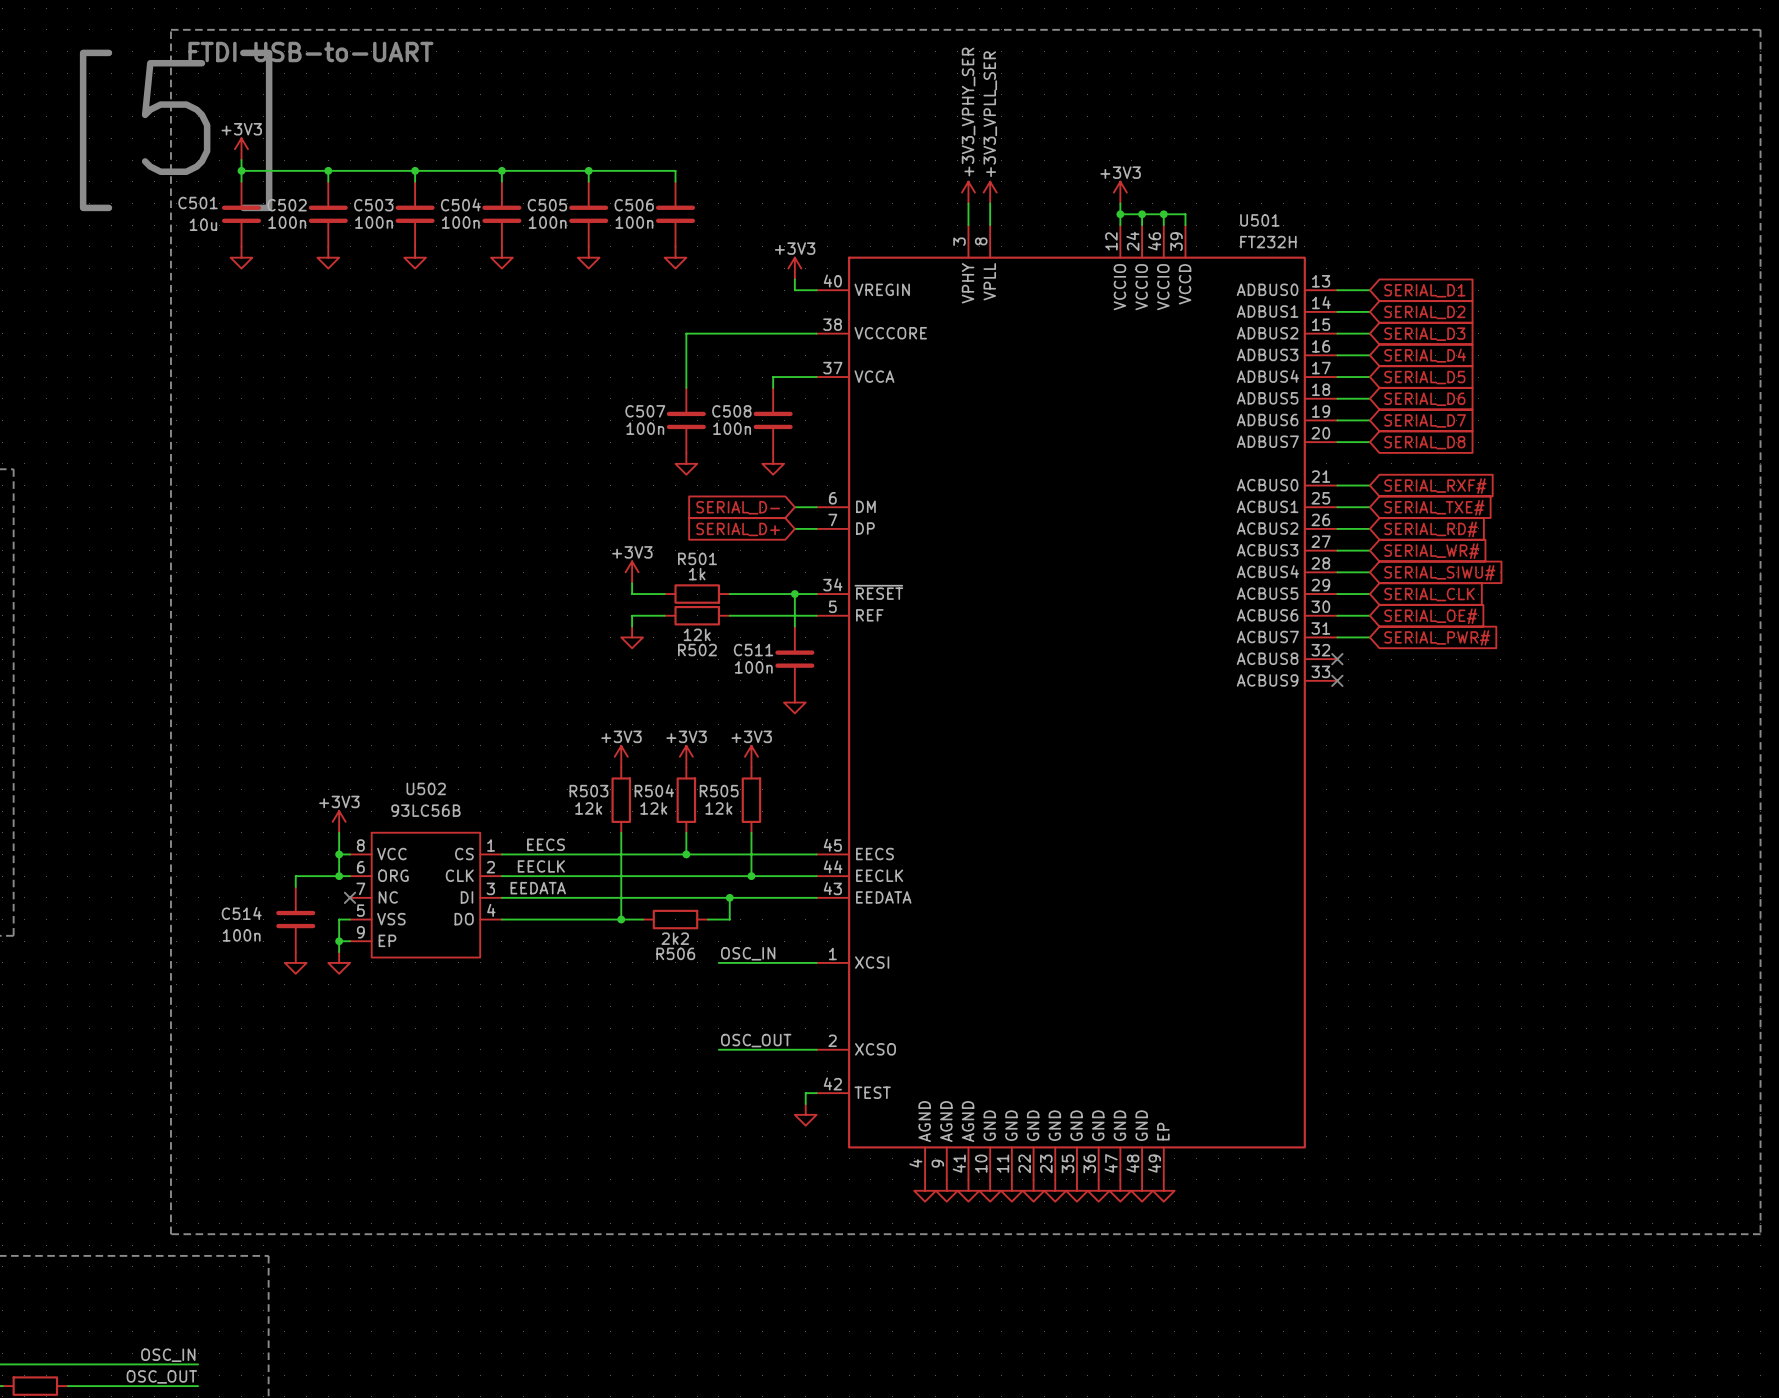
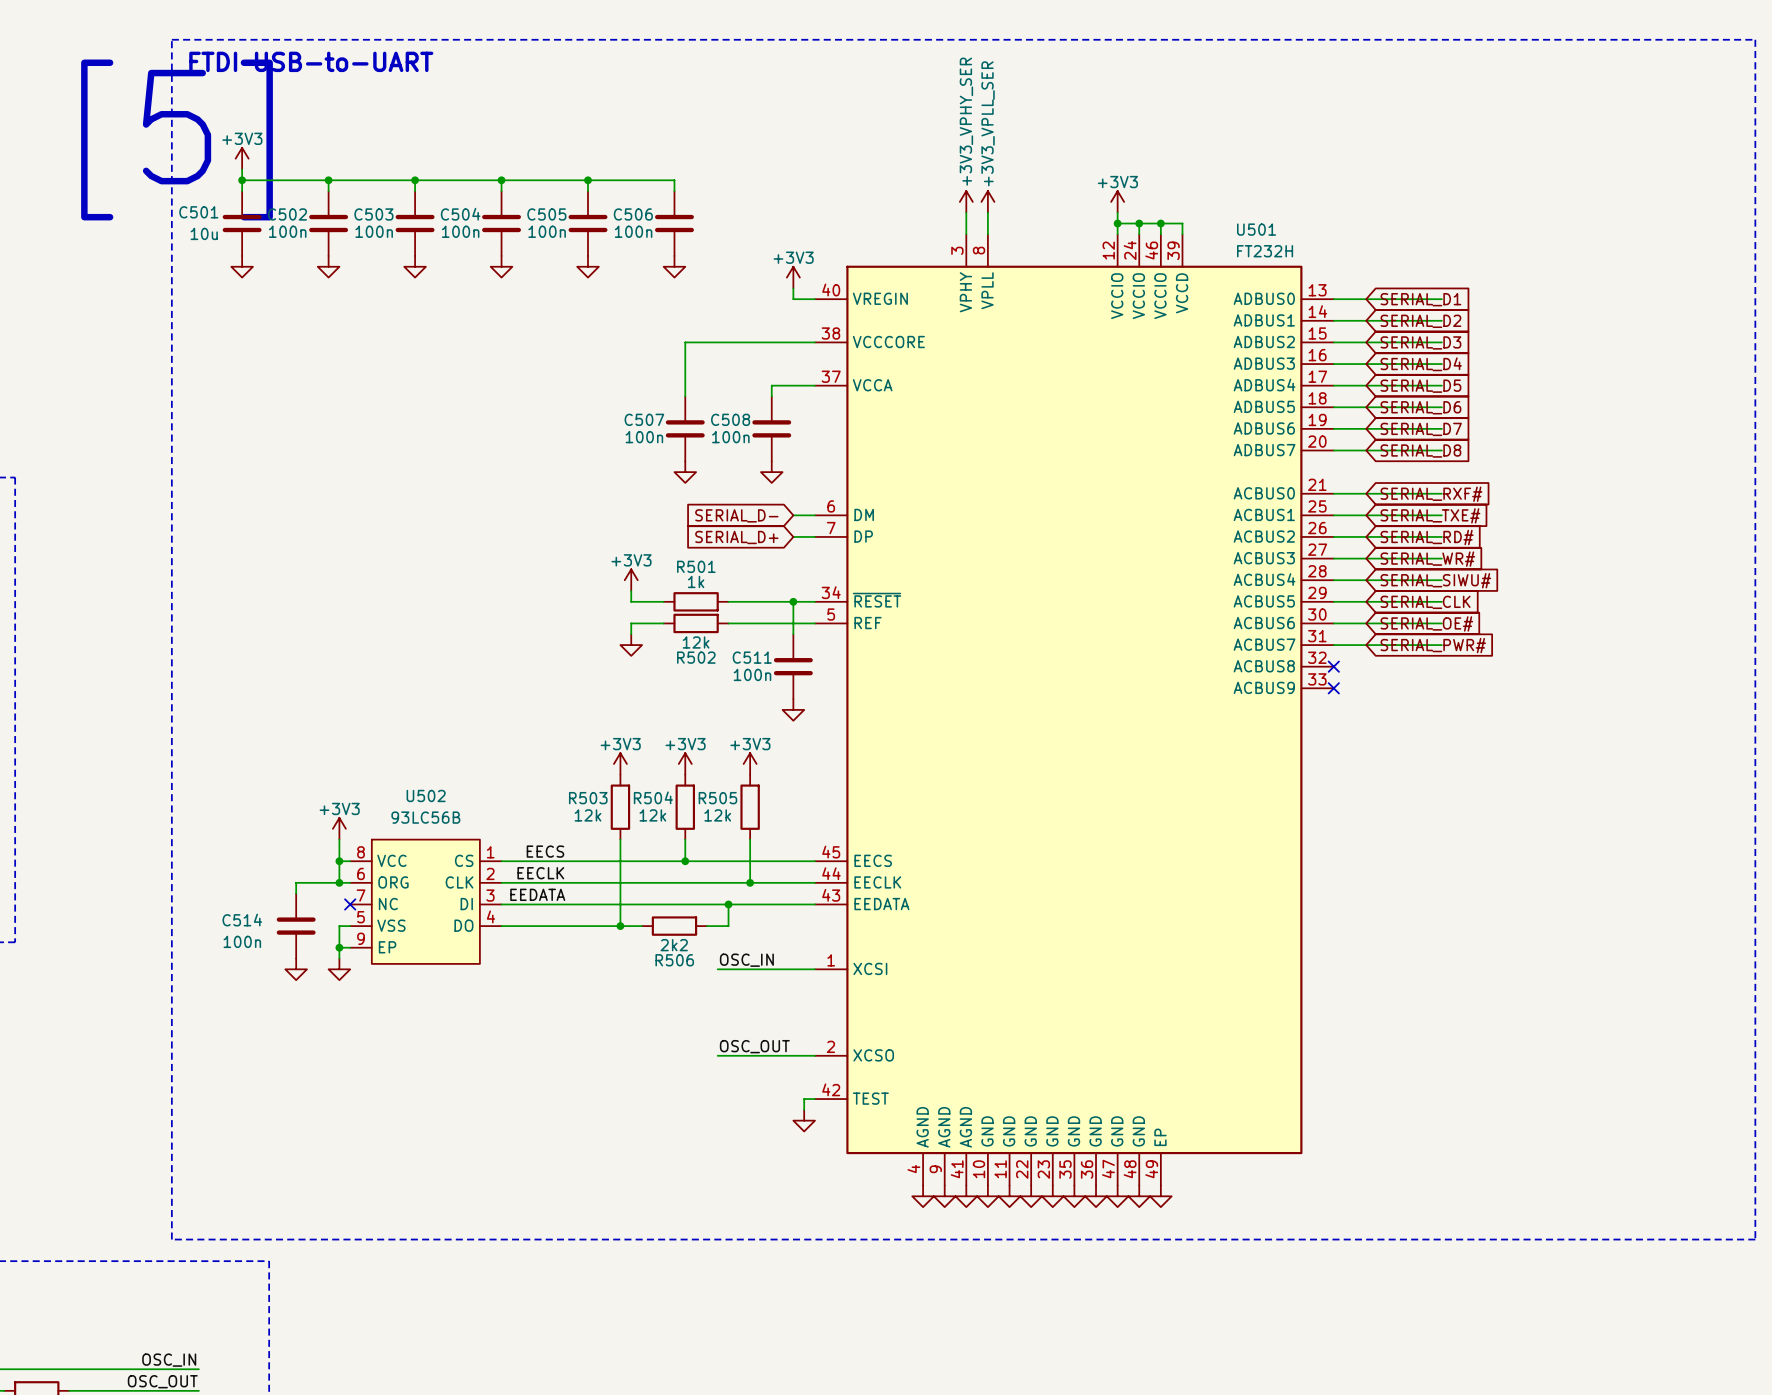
wire: none -> (1366, 299) (1441, 299)
wire: none -> (1366, 320) (1441, 320)
wire: none -> (1366, 342) (1441, 342)
wire: none -> (1366, 364) (1441, 364)
wire: none -> (1366, 385) (1441, 385)
wire: none -> (1366, 407) (1441, 407)
wire: none -> (1366, 428) (1441, 428)
wire: none -> (1366, 450) (1441, 450)
wire: none -> (1366, 493) (1441, 493)
wire: none -> (1366, 515) (1441, 515)
wire: none -> (1366, 536) (1441, 536)
wire: none -> (1366, 558) (1441, 558)
wire: none -> (1366, 580) (1441, 580)
wire: none -> (1366, 601) (1441, 601)
wire: none -> (1366, 623) (1441, 623)
wire: none -> (1366, 645) (1441, 645)

